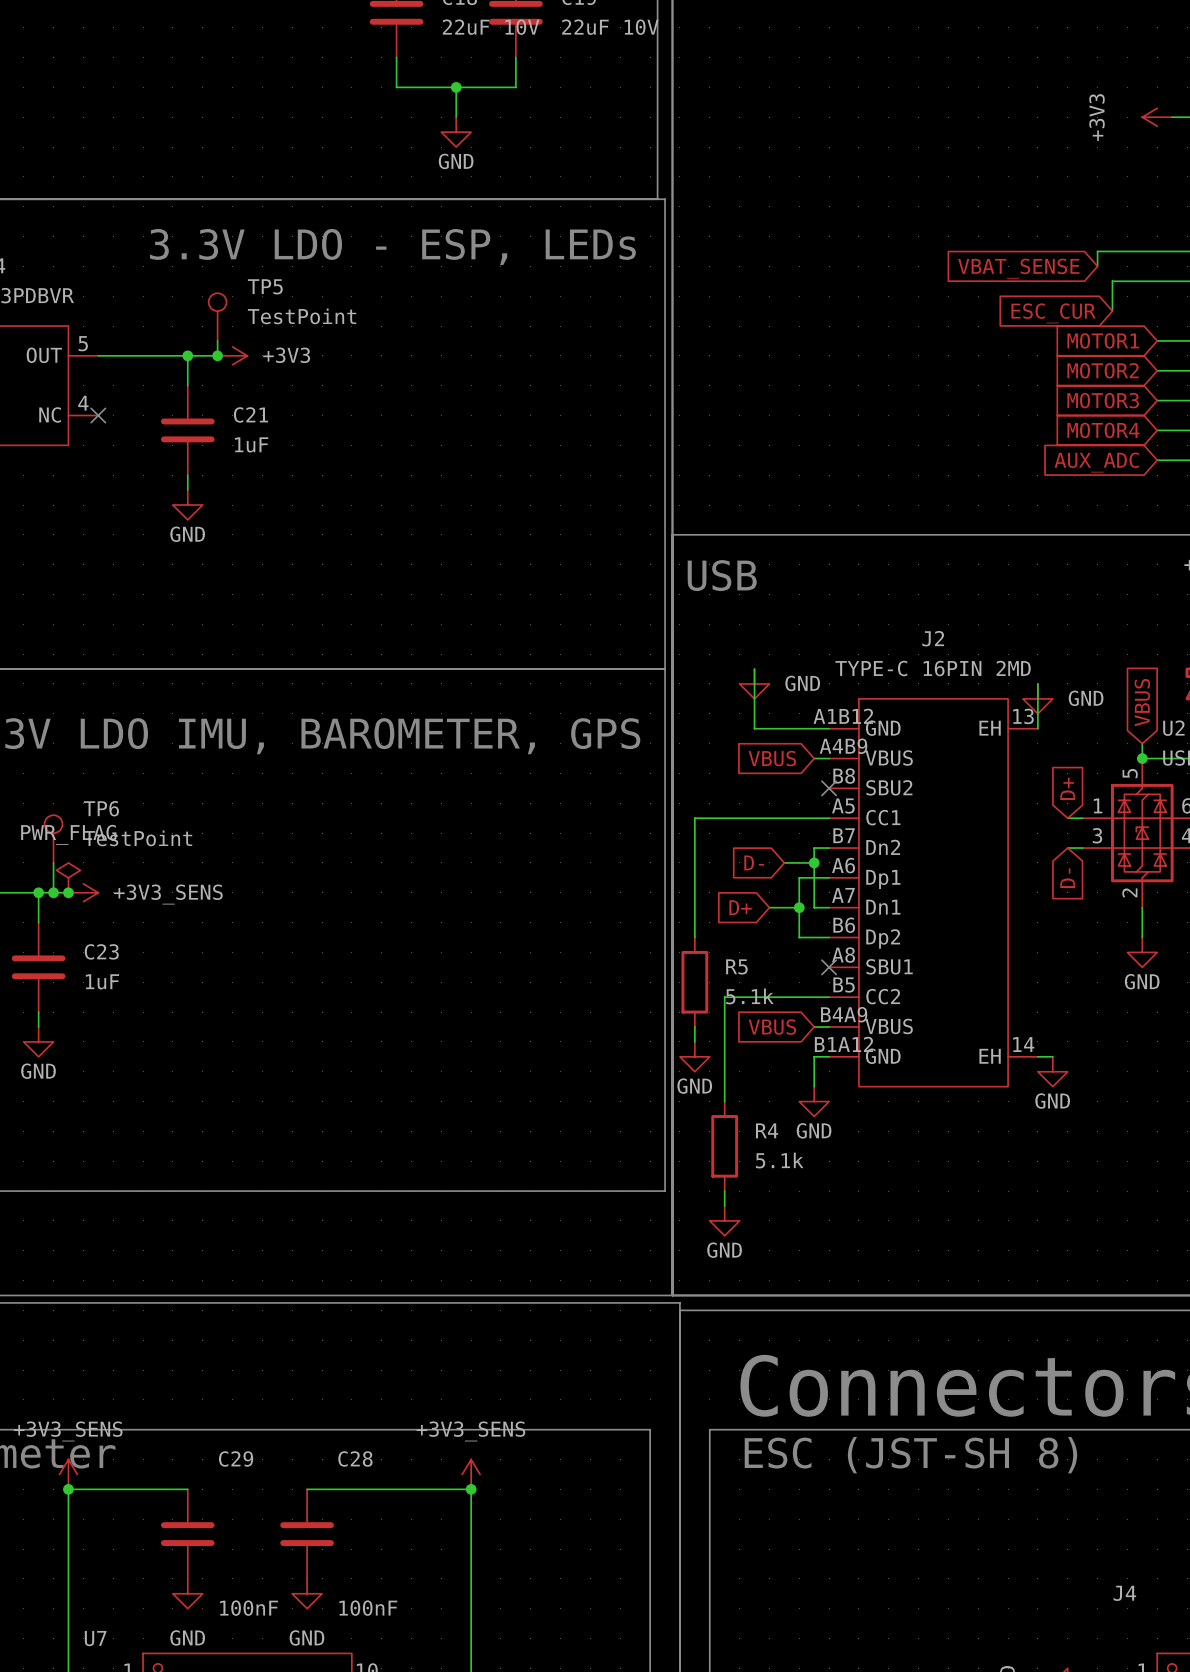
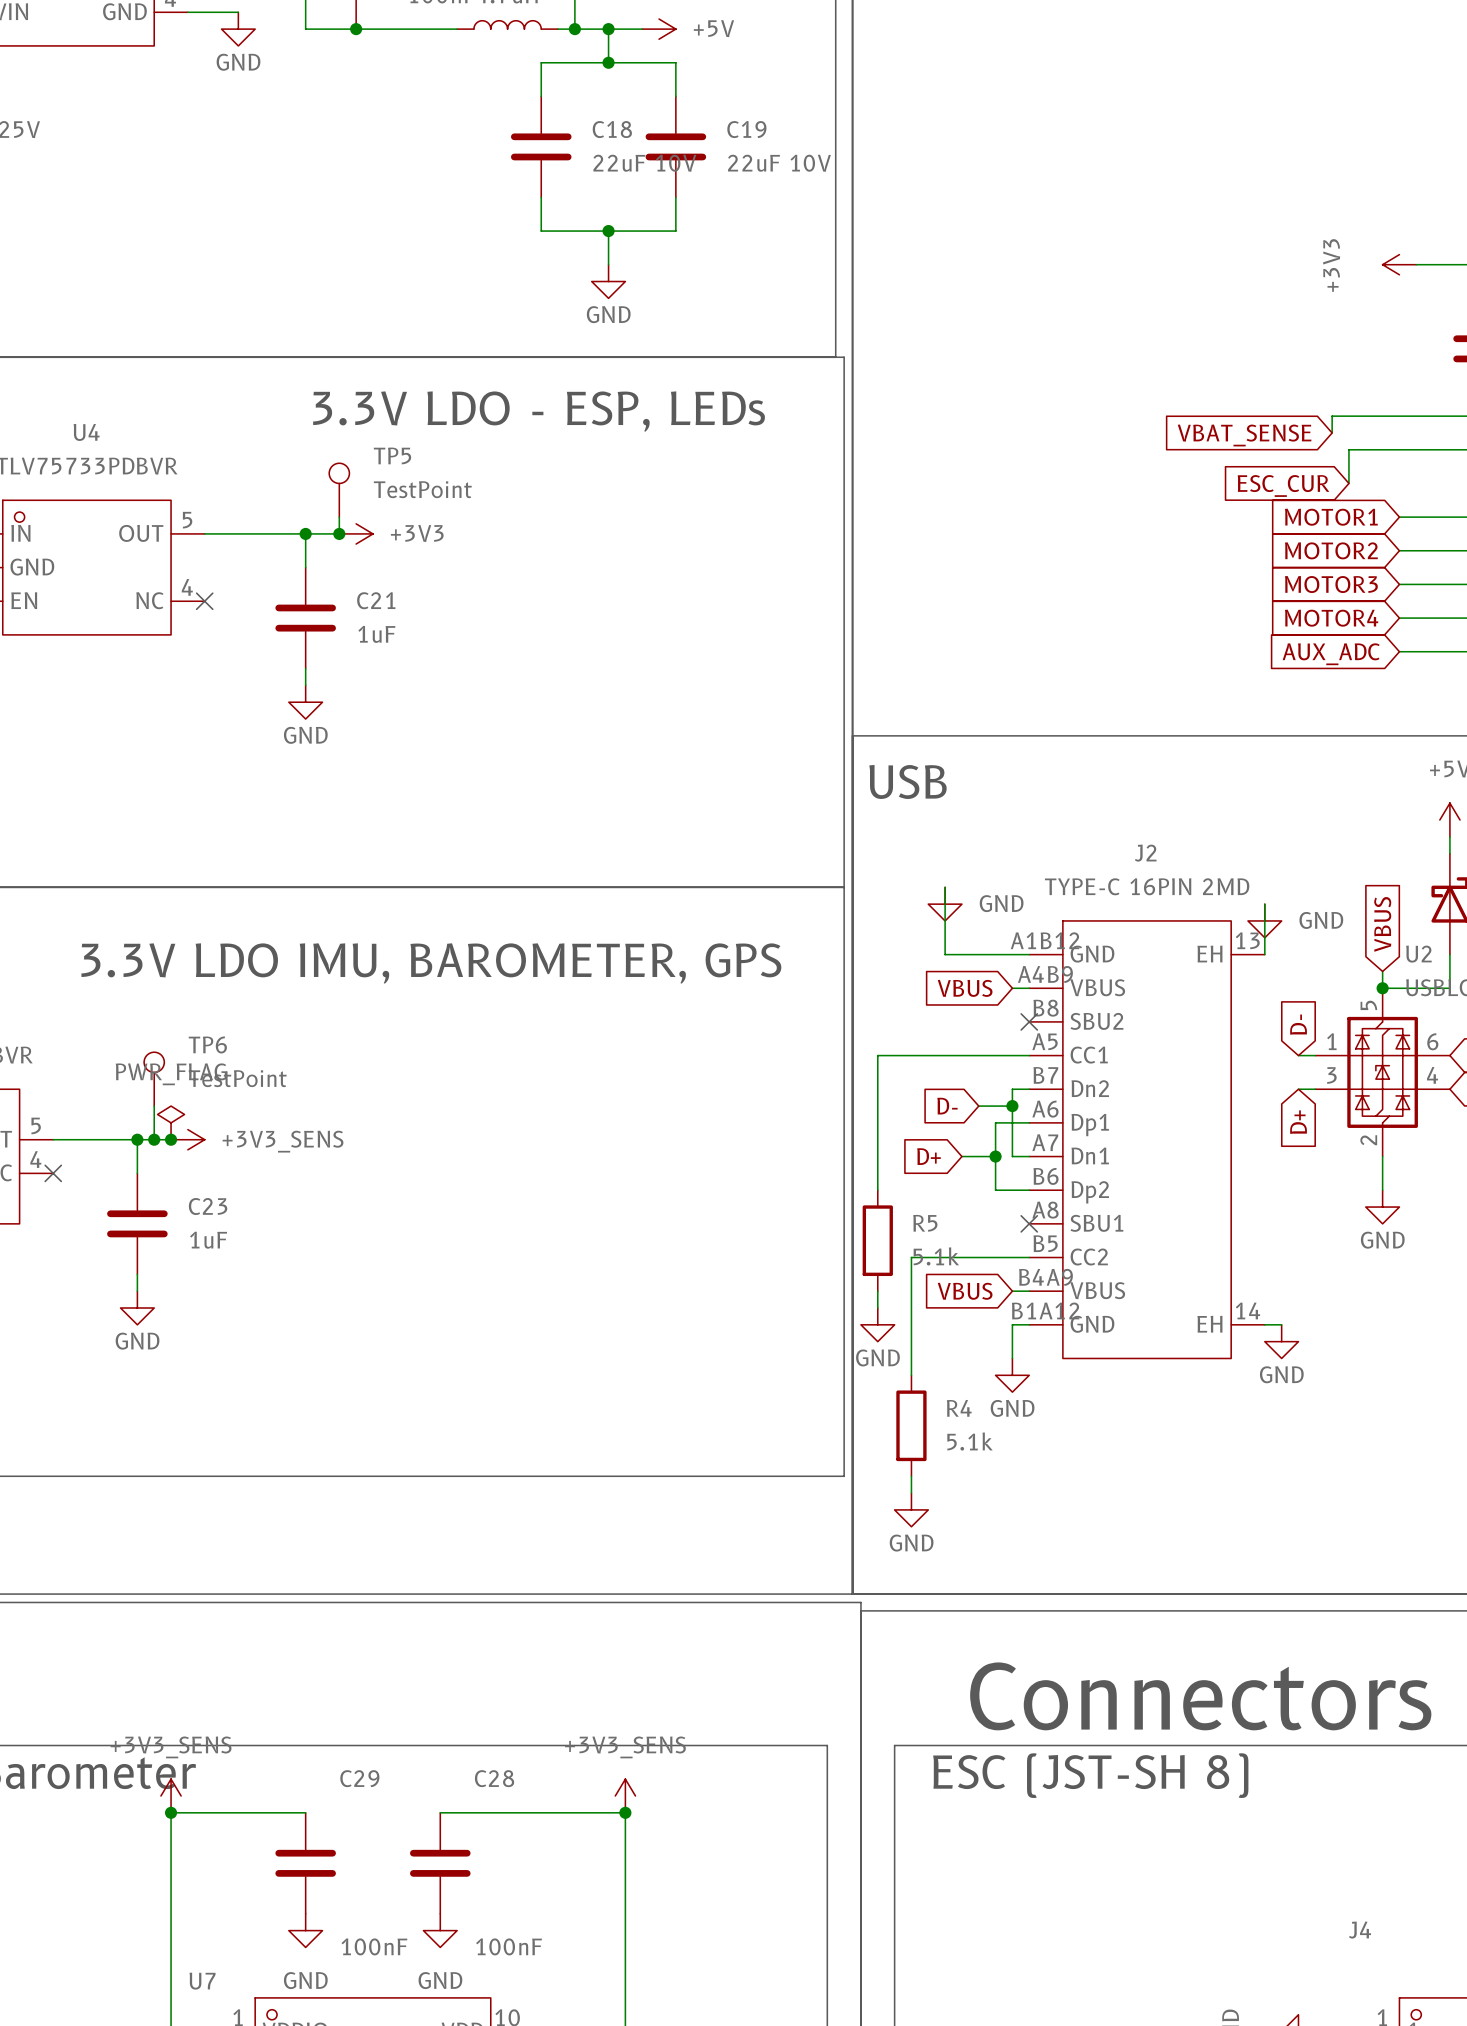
global label: D+ (1067, 788) -> D- (1298, 1024)
global label: D- (1067, 878) -> D+ (1298, 1122)

